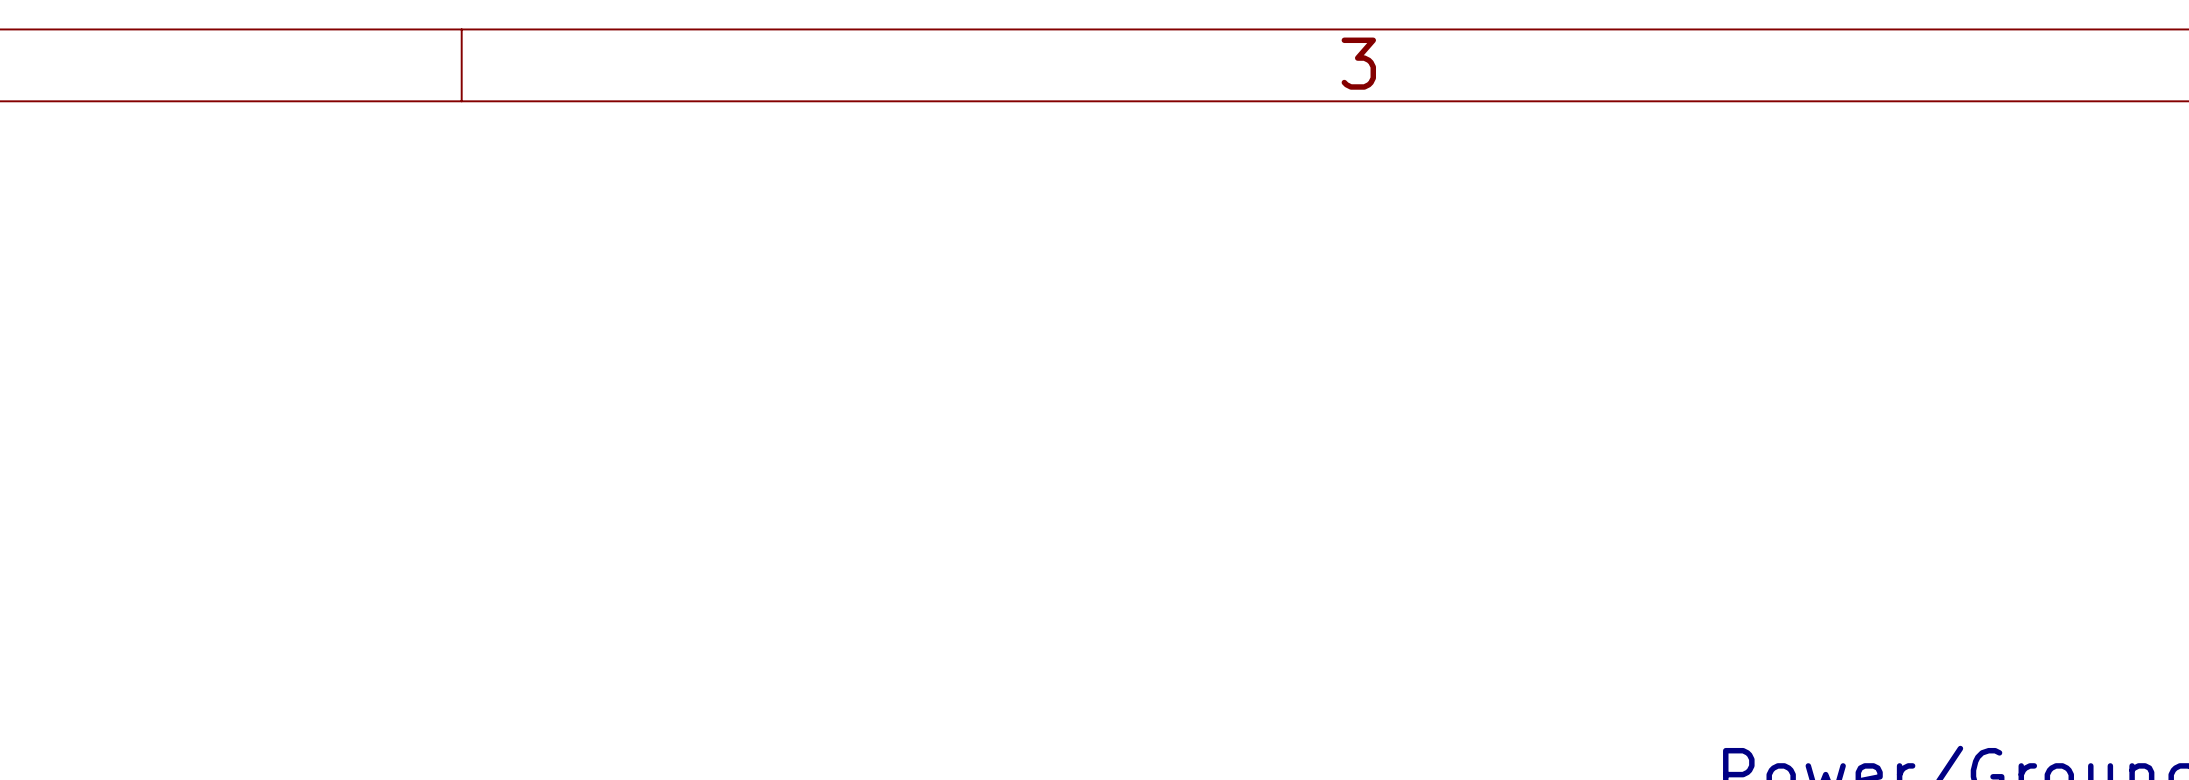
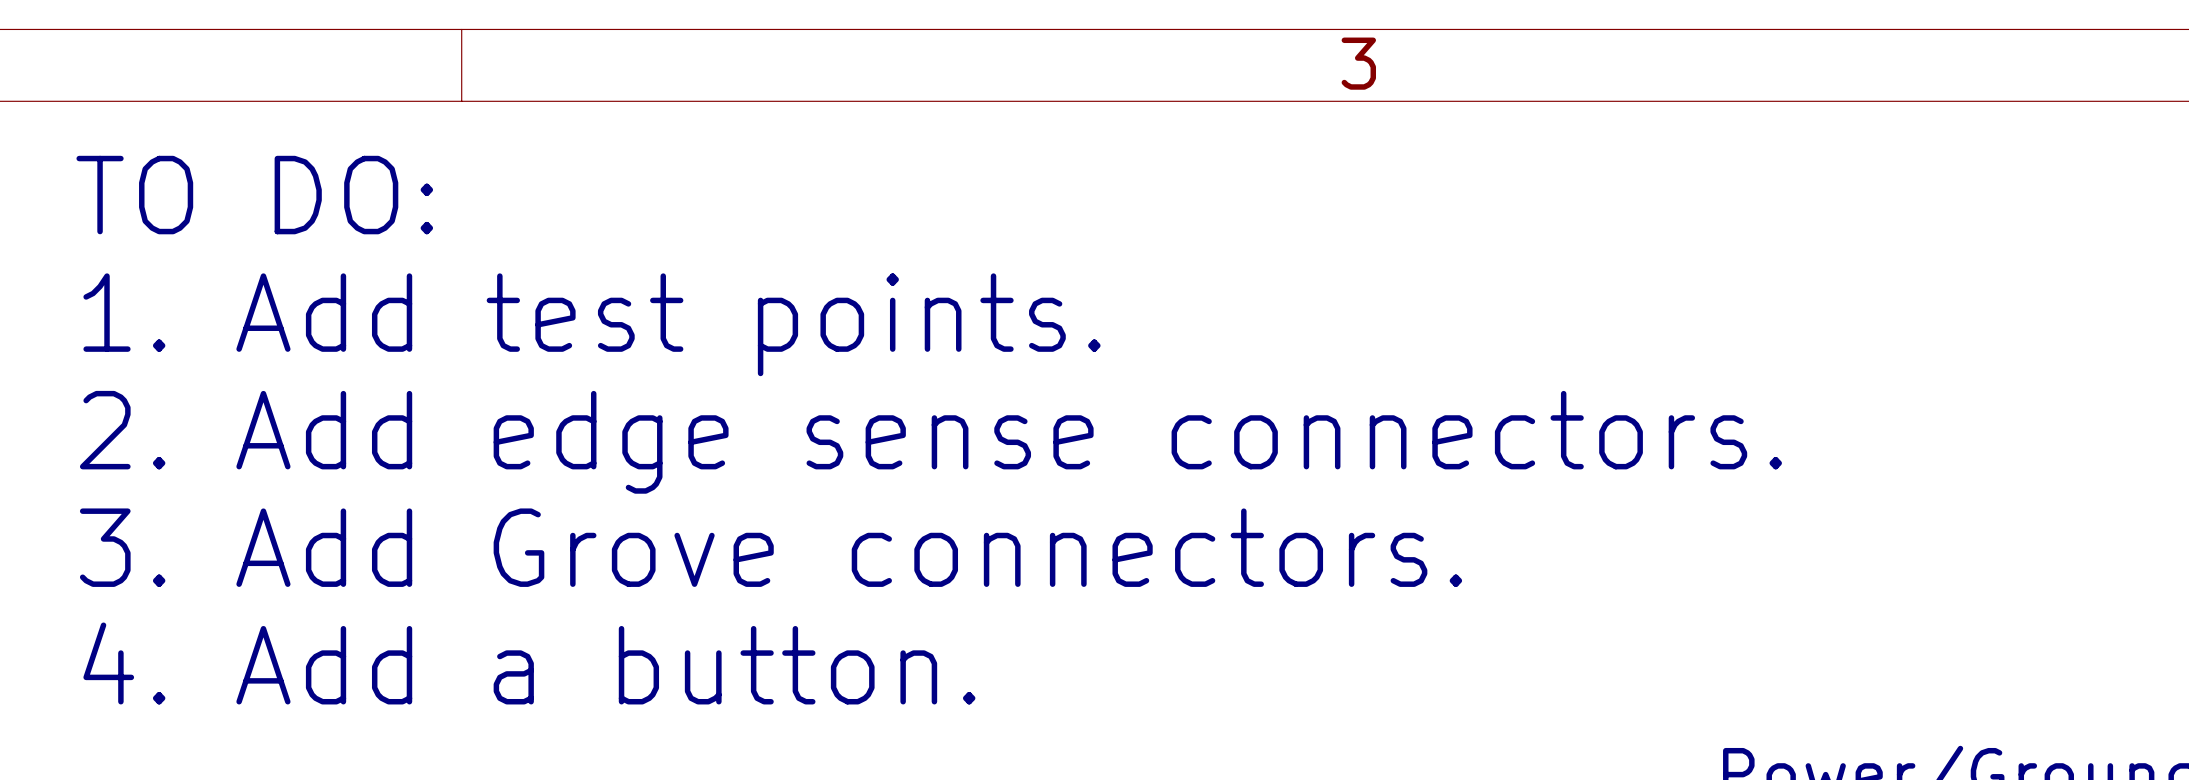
text: none -> TO DO: (254, 195)
text: none -> 1. Add test points. (591, 324)
text: none -> 2. Add edge sense connectors. (930, 442)
text: none -> 3. Add Grove connectors. (771, 547)
text: none -> 4. Add a button. (529, 663)

